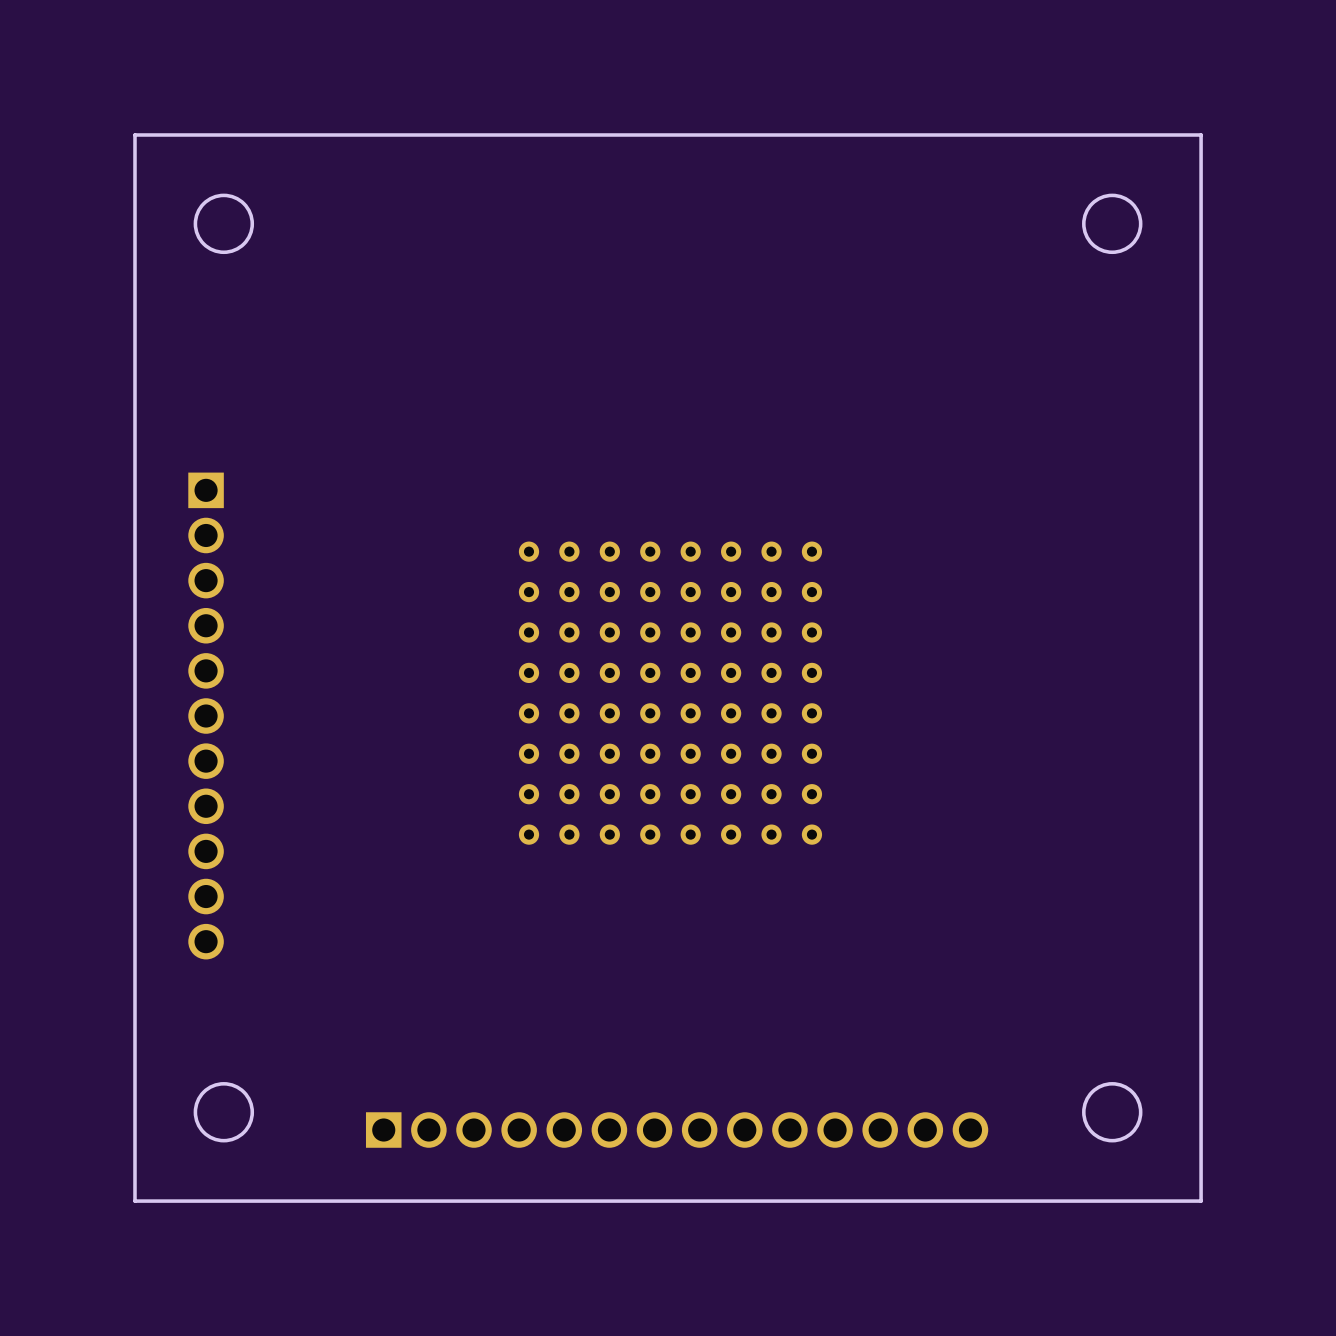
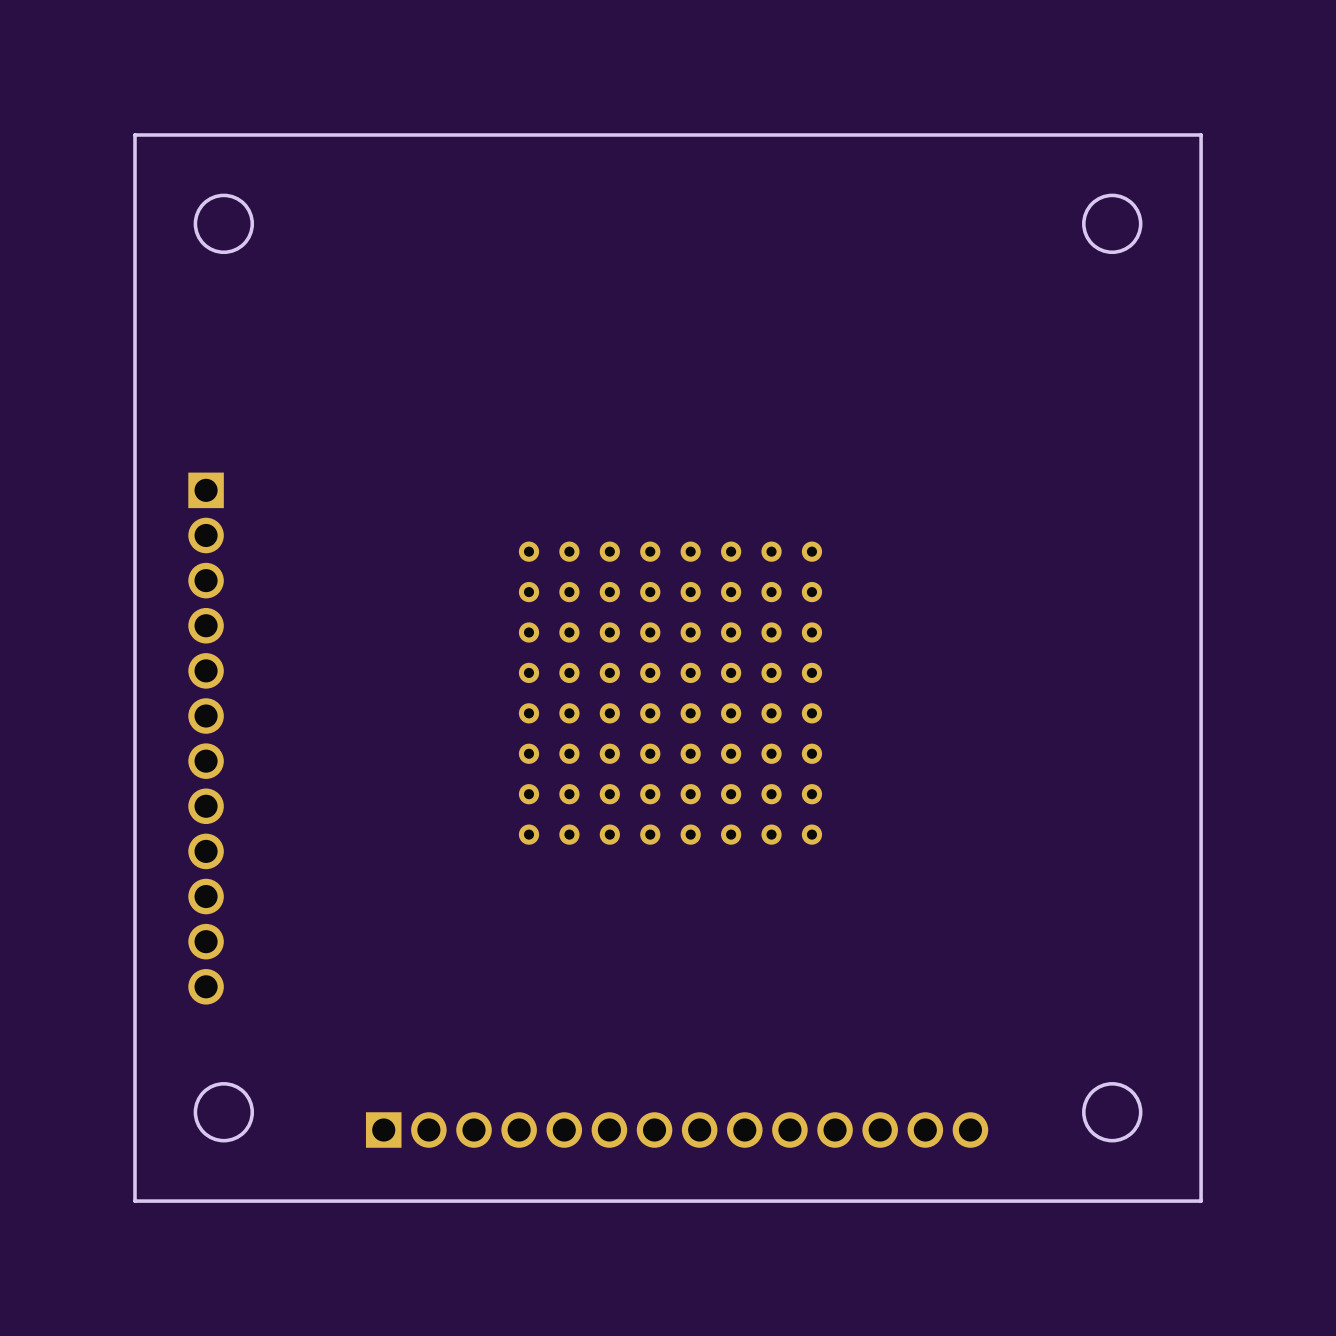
part footprint: [188, 472, 224, 960] -> [188, 472, 224, 1005]

